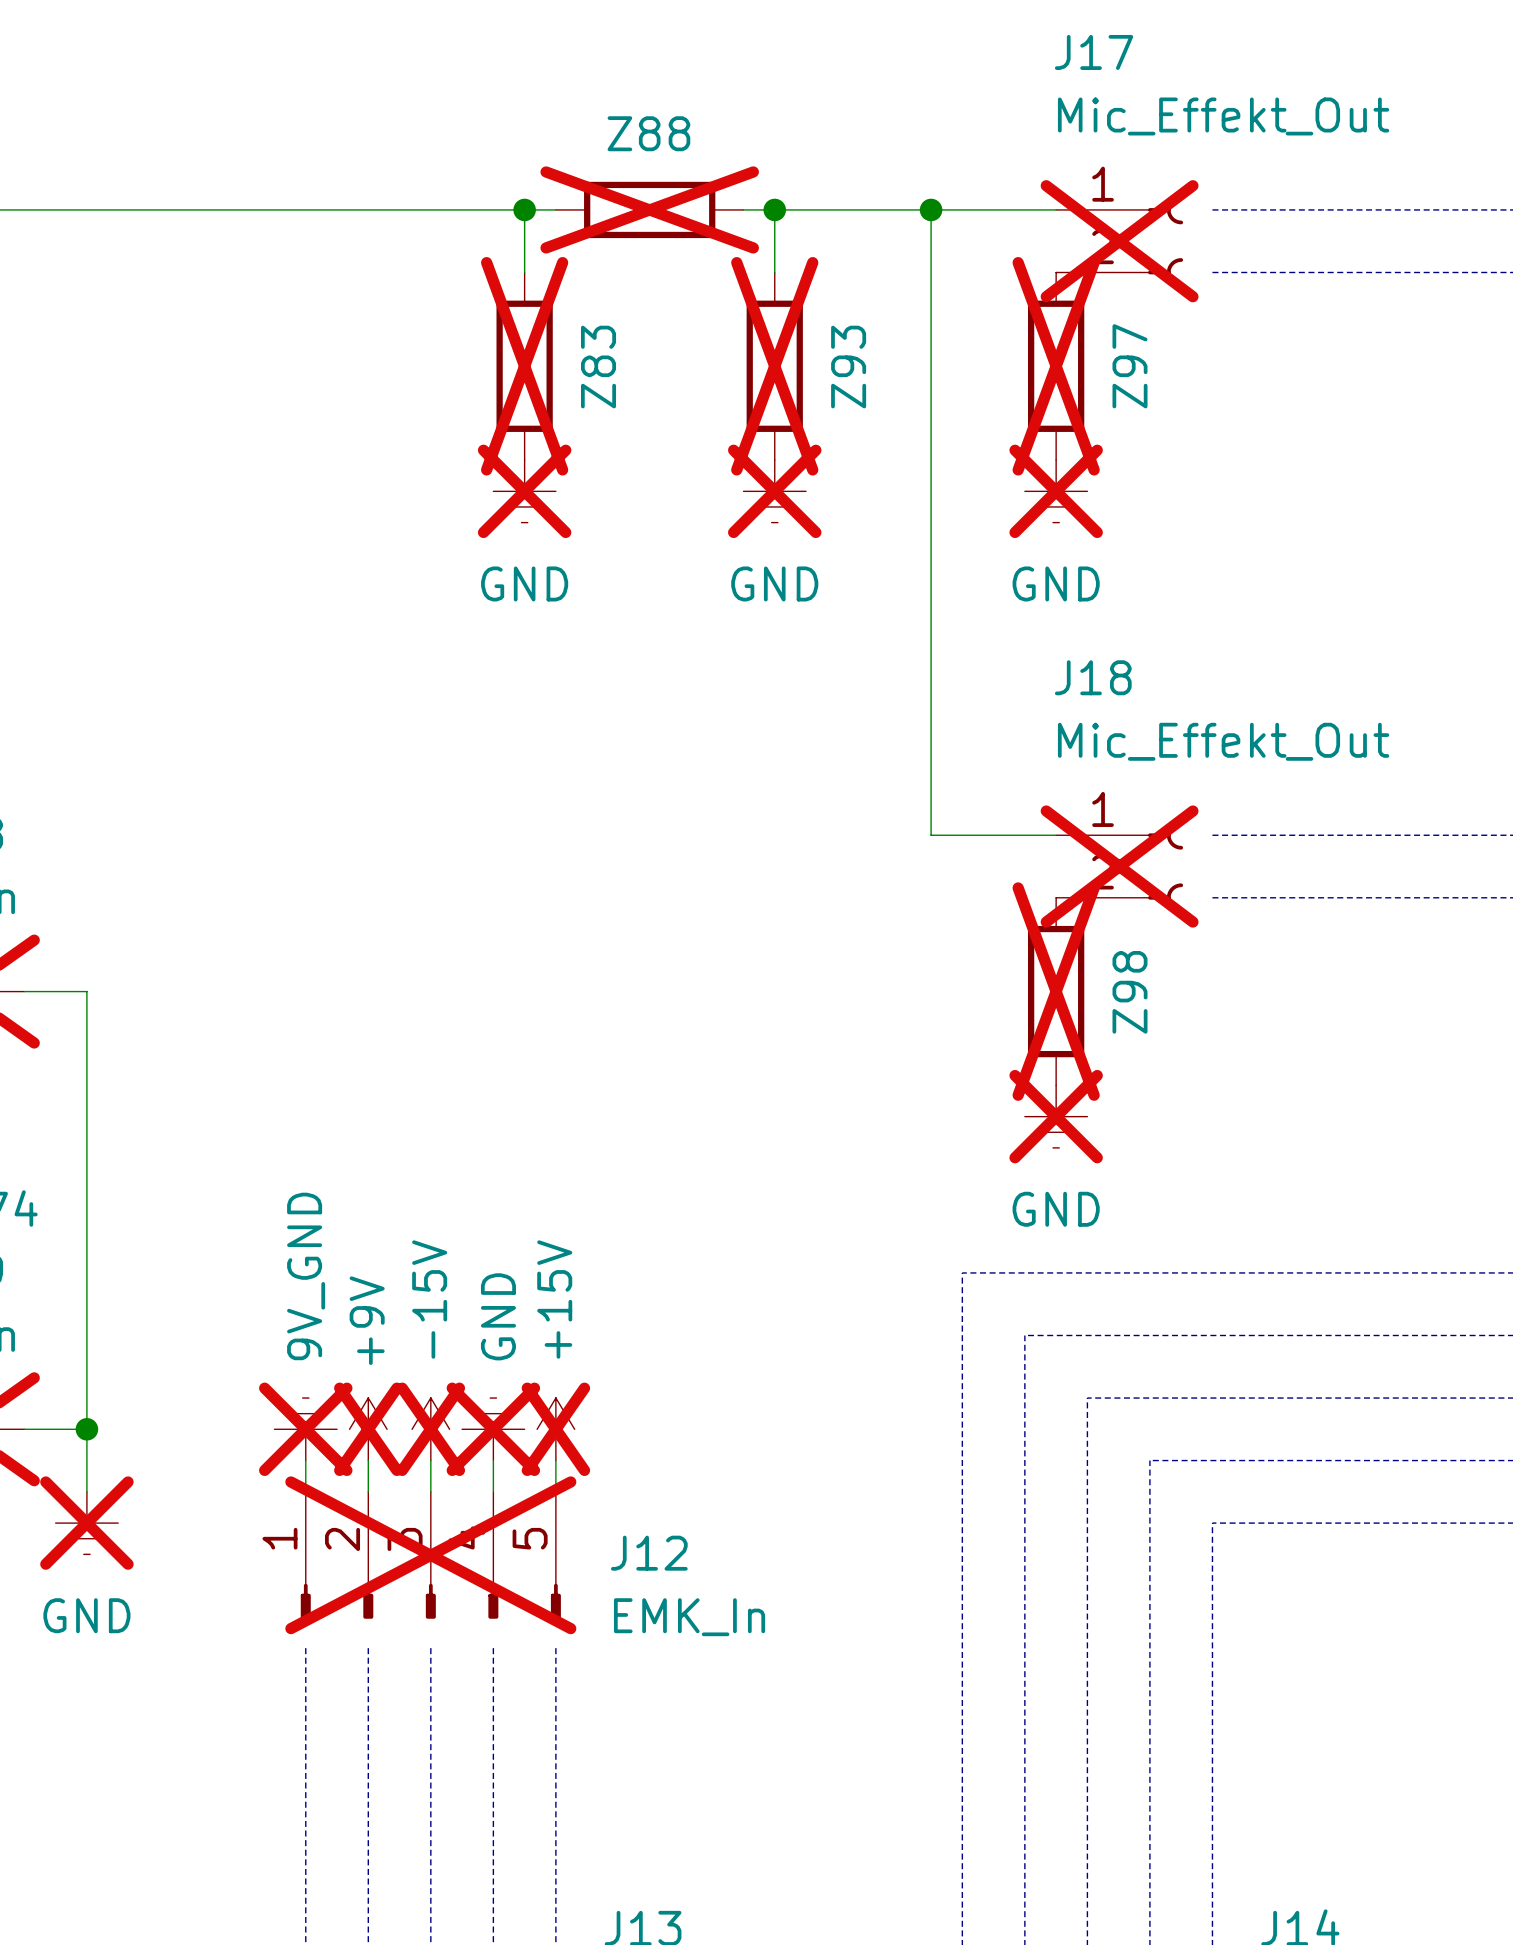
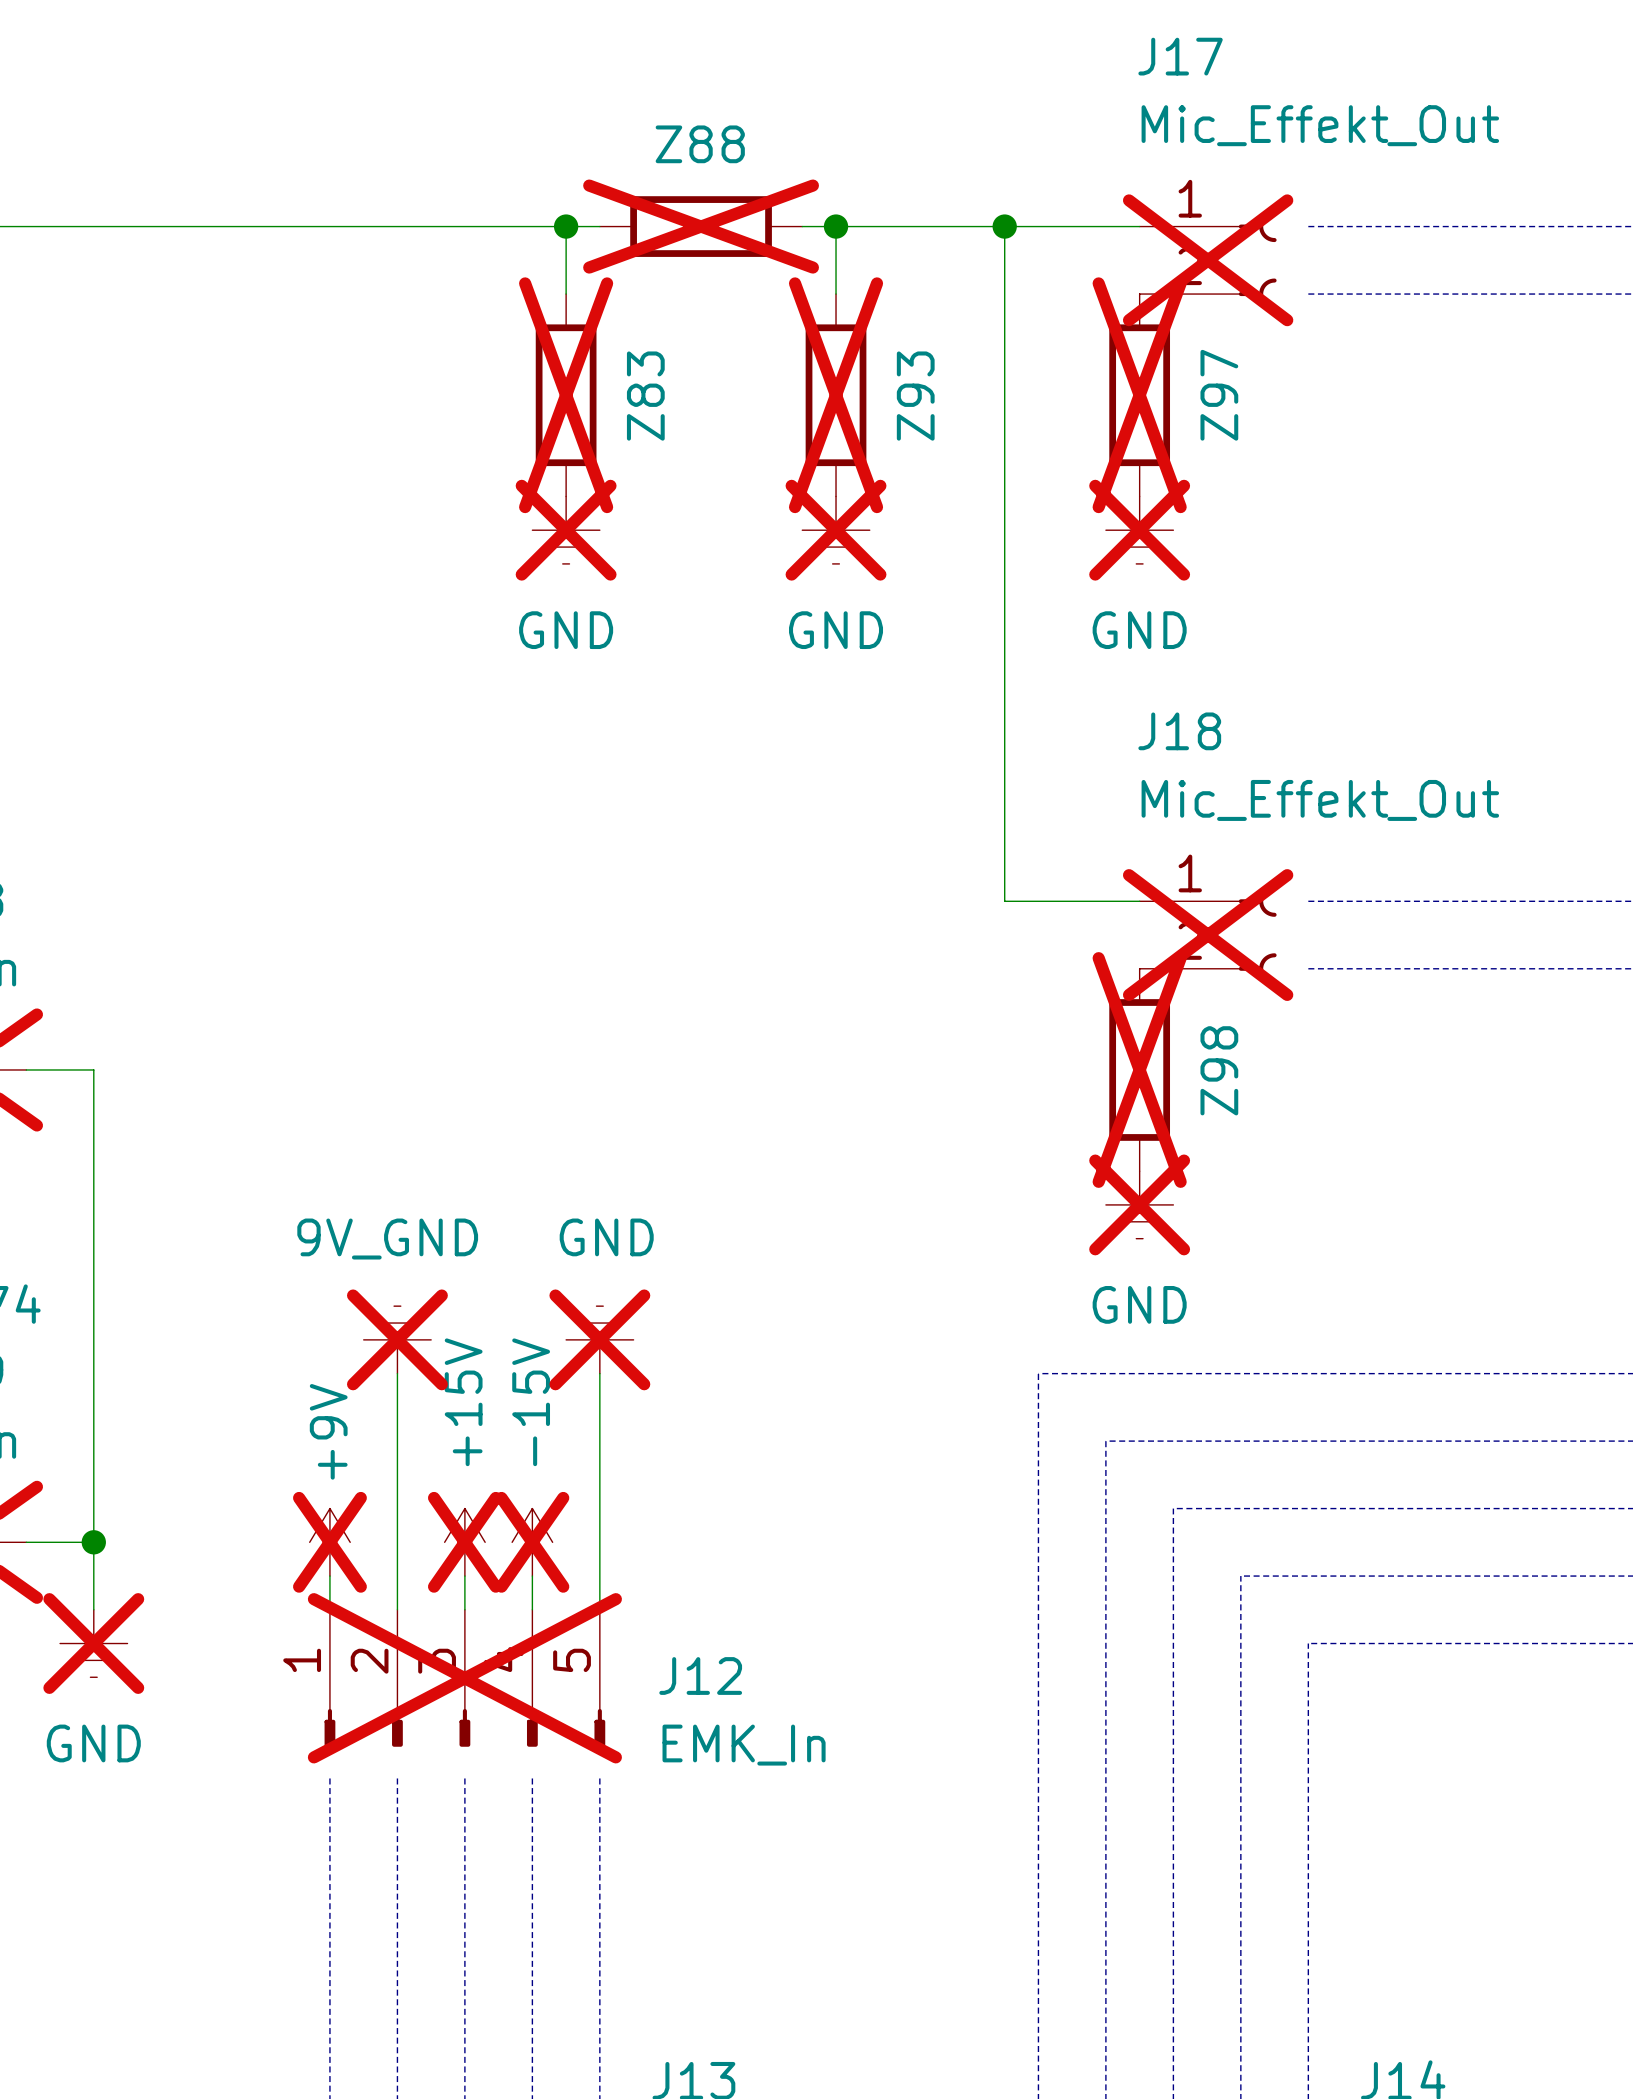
power symbol: none -> 9V_GND (397, 1339)
power symbol: none -> GND (599, 1339)
wire: none -> (397, 1373) (397, 1576)
wire: none -> (599, 1373) (599, 1576)
power symbol: 9V_GND (305, 1429) -> +9V (329, 1542)
power symbol: +9V (368, 1429) -> none
power symbol: -15V (430, 1429) -> +15V (464, 1542)
power symbol: GND (493, 1429) -> -15V (532, 1542)
power symbol: +15V (555, 1429) -> none

